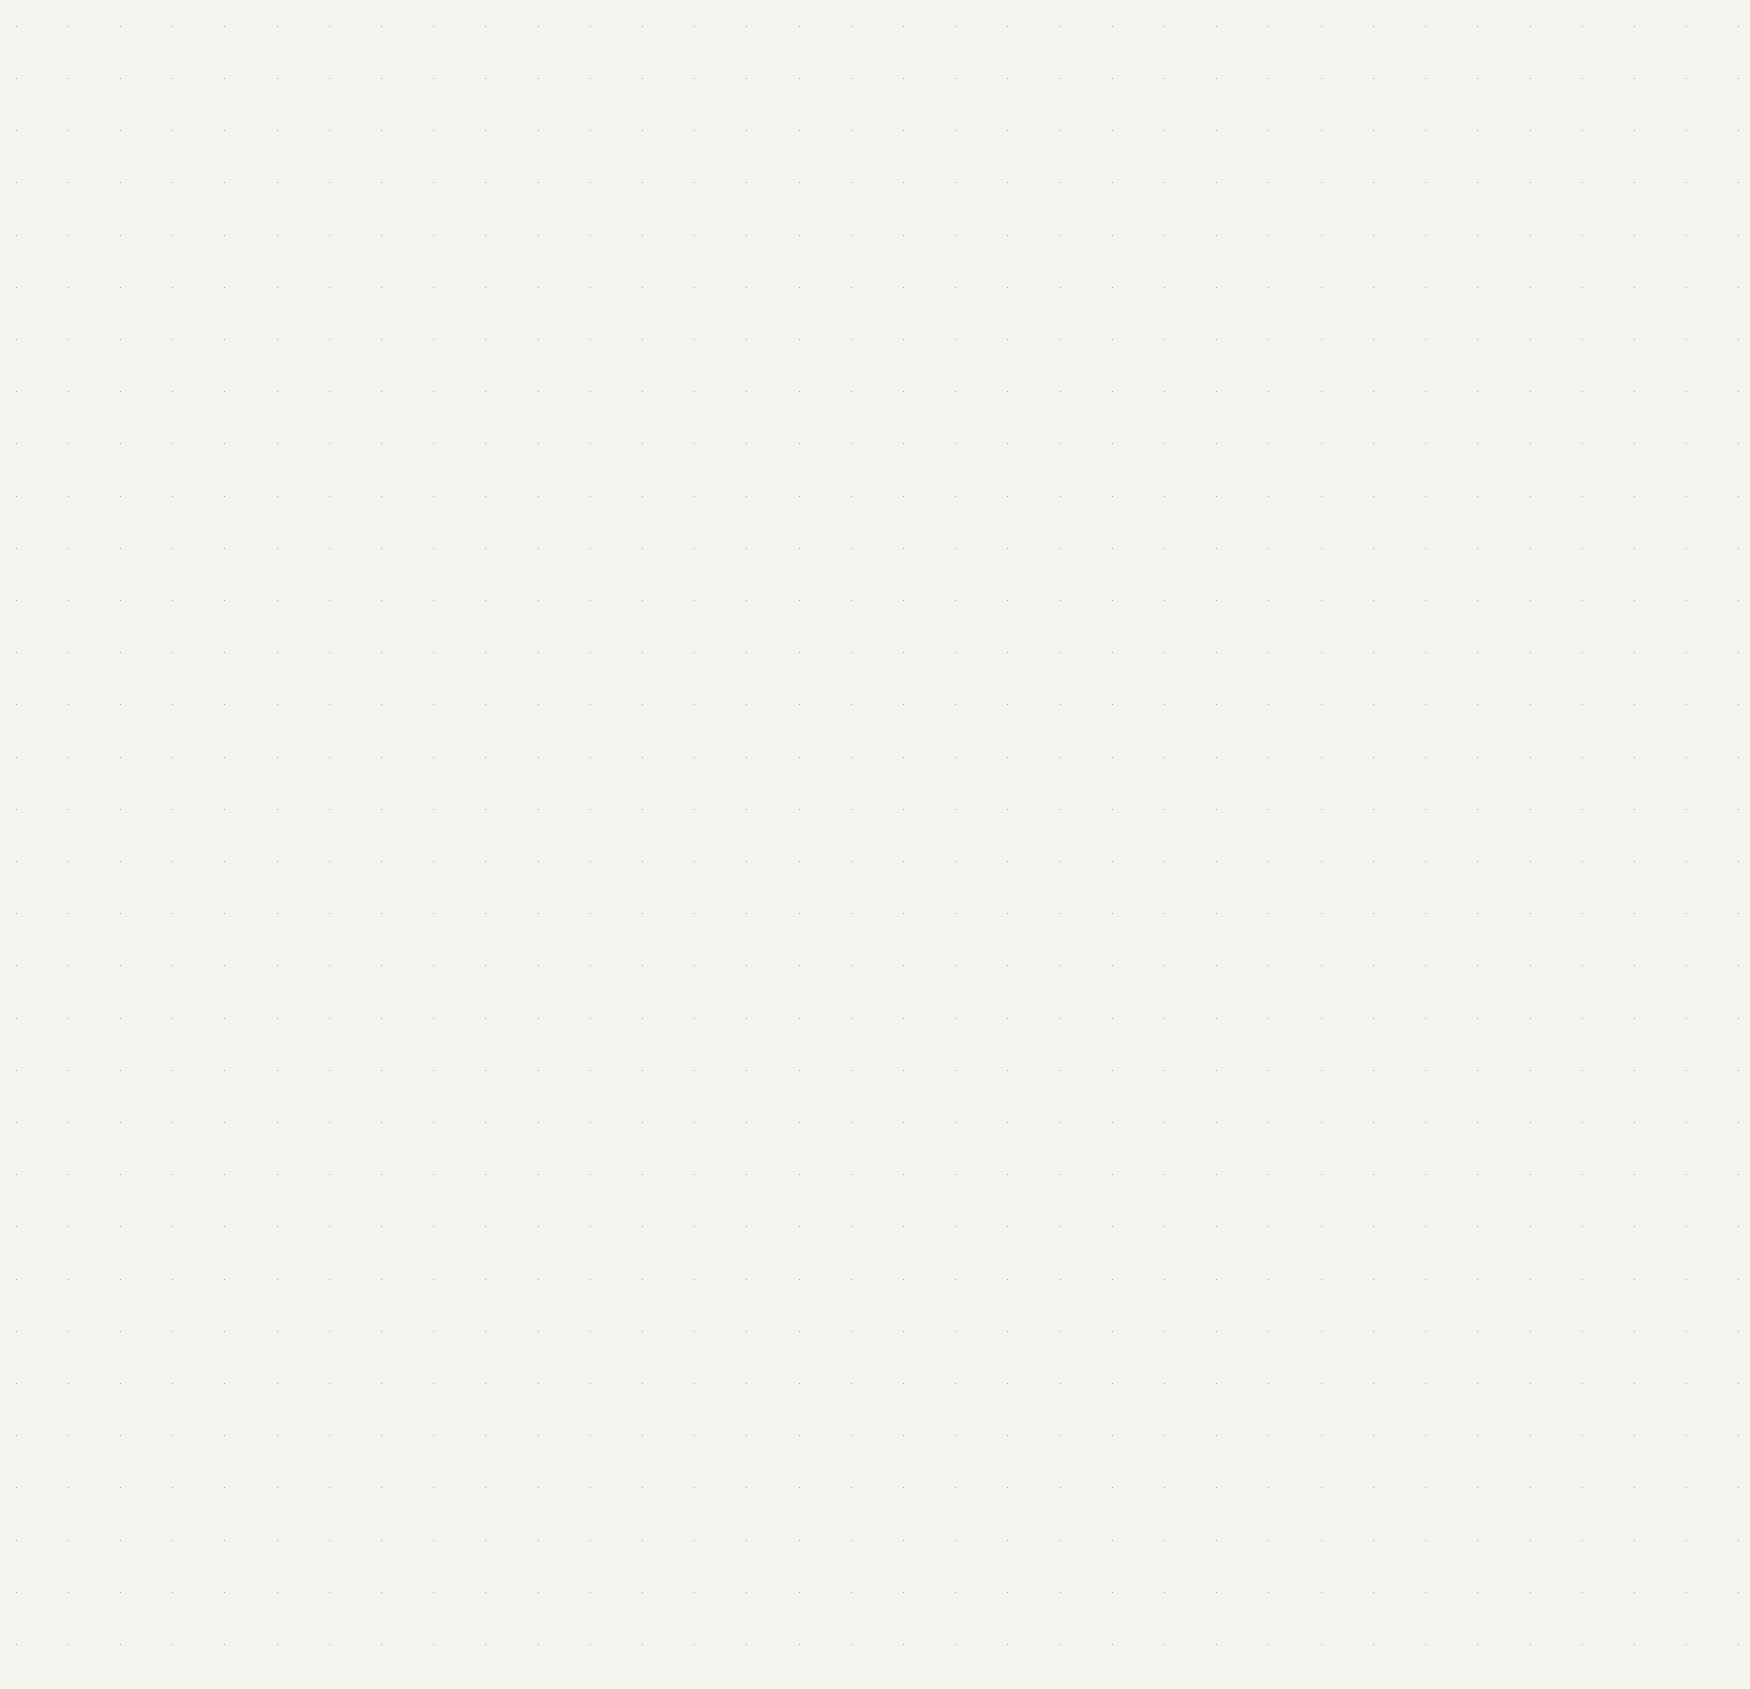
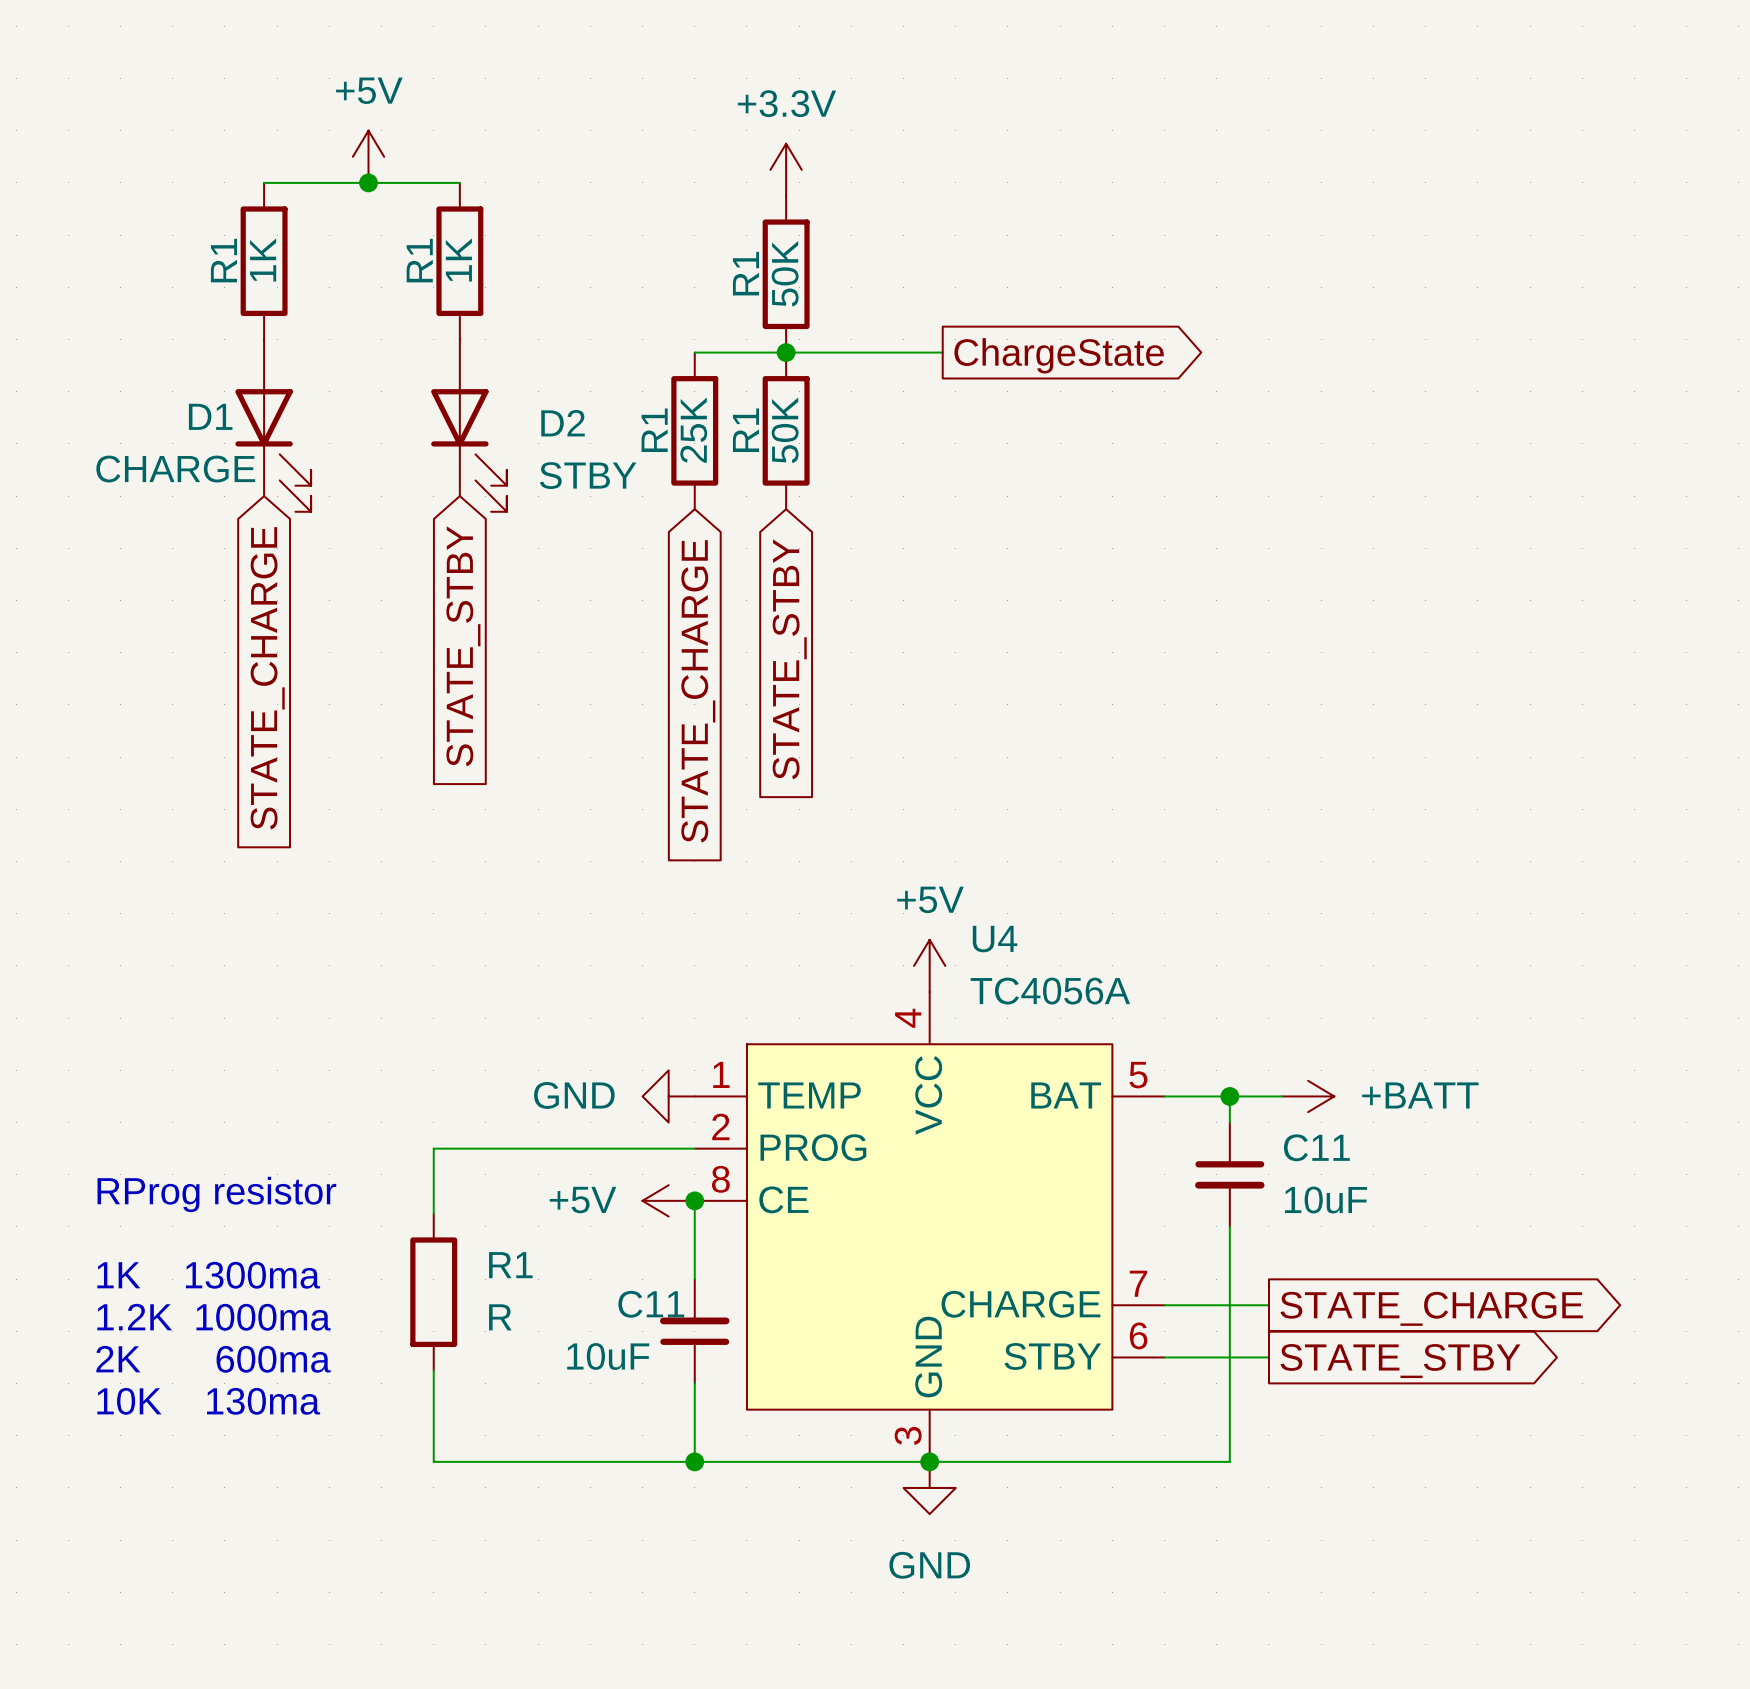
power symbol: none -> +5V (368, 156)
power symbol: none -> +3.3V (786, 169)
wire: none -> (264, 182) (459, 182)
junction: none -> (368, 182)
R1: none -> 1K (264, 261)
R1: none -> 1K (459, 261)
R1: none -> 50K (786, 274)
wire: none -> (694, 352) (942, 352)
junction: none -> (786, 352)
global label: none -> ChargeState (1059, 355)
D1: none -> CHARGE (273, 425)
D2: none -> STBY (468, 425)
R1: none -> 25K (694, 430)
R1: none -> 50K (786, 430)
global label: none -> STATE_STBY (463, 646)
global label: none -> STATE_STBY (789, 659)
global label: none -> STATE_CHARGE (267, 678)
global label: none -> STATE_CHARGE (698, 691)
power symbol: none -> +5V (929, 965)
power symbol: none -> GND (668, 1096)
wire: none -> (1164, 1096) (1282, 1096)
wire: none -> (1229, 1096) (1229, 1122)
junction: none -> (1229, 1096)
power symbol: none -> +BATT (1308, 1096)
wire: none -> (694, 1148) (433, 1148) (433, 1213)
C11: none -> 10uF (1229, 1174)
text: none -> RProg resistor (216, 1194)
power symbol: none -> +5V (668, 1200)
wire: none -> (694, 1200) (694, 1279)
junction: none -> (694, 1200)
U4: none -> TC4056A (929, 1226)
wire: none -> (1229, 1226) (1229, 1461) (433, 1461) (433, 1370)
text: none -> 1K 1300ma (208, 1275)
R1: none -> R (433, 1292)
wire: none -> (1164, 1305) (1268, 1305)
global label: none -> STATE_CHARGE (1431, 1308)
text: none -> 1.2K 1000ma (214, 1317)
C11: none -> 10uF (694, 1331)
wire: none -> (1164, 1357) (1268, 1357)
text: none -> 2K 600ma (213, 1359)
global label: none -> STATE_STBY (1400, 1361)
wire: none -> (694, 1383) (694, 1461)
text: none -> 10K 130ma (208, 1401)
junction: none -> (694, 1461)
junction: none -> (929, 1461)
power symbol: none -> GND (929, 1487)

